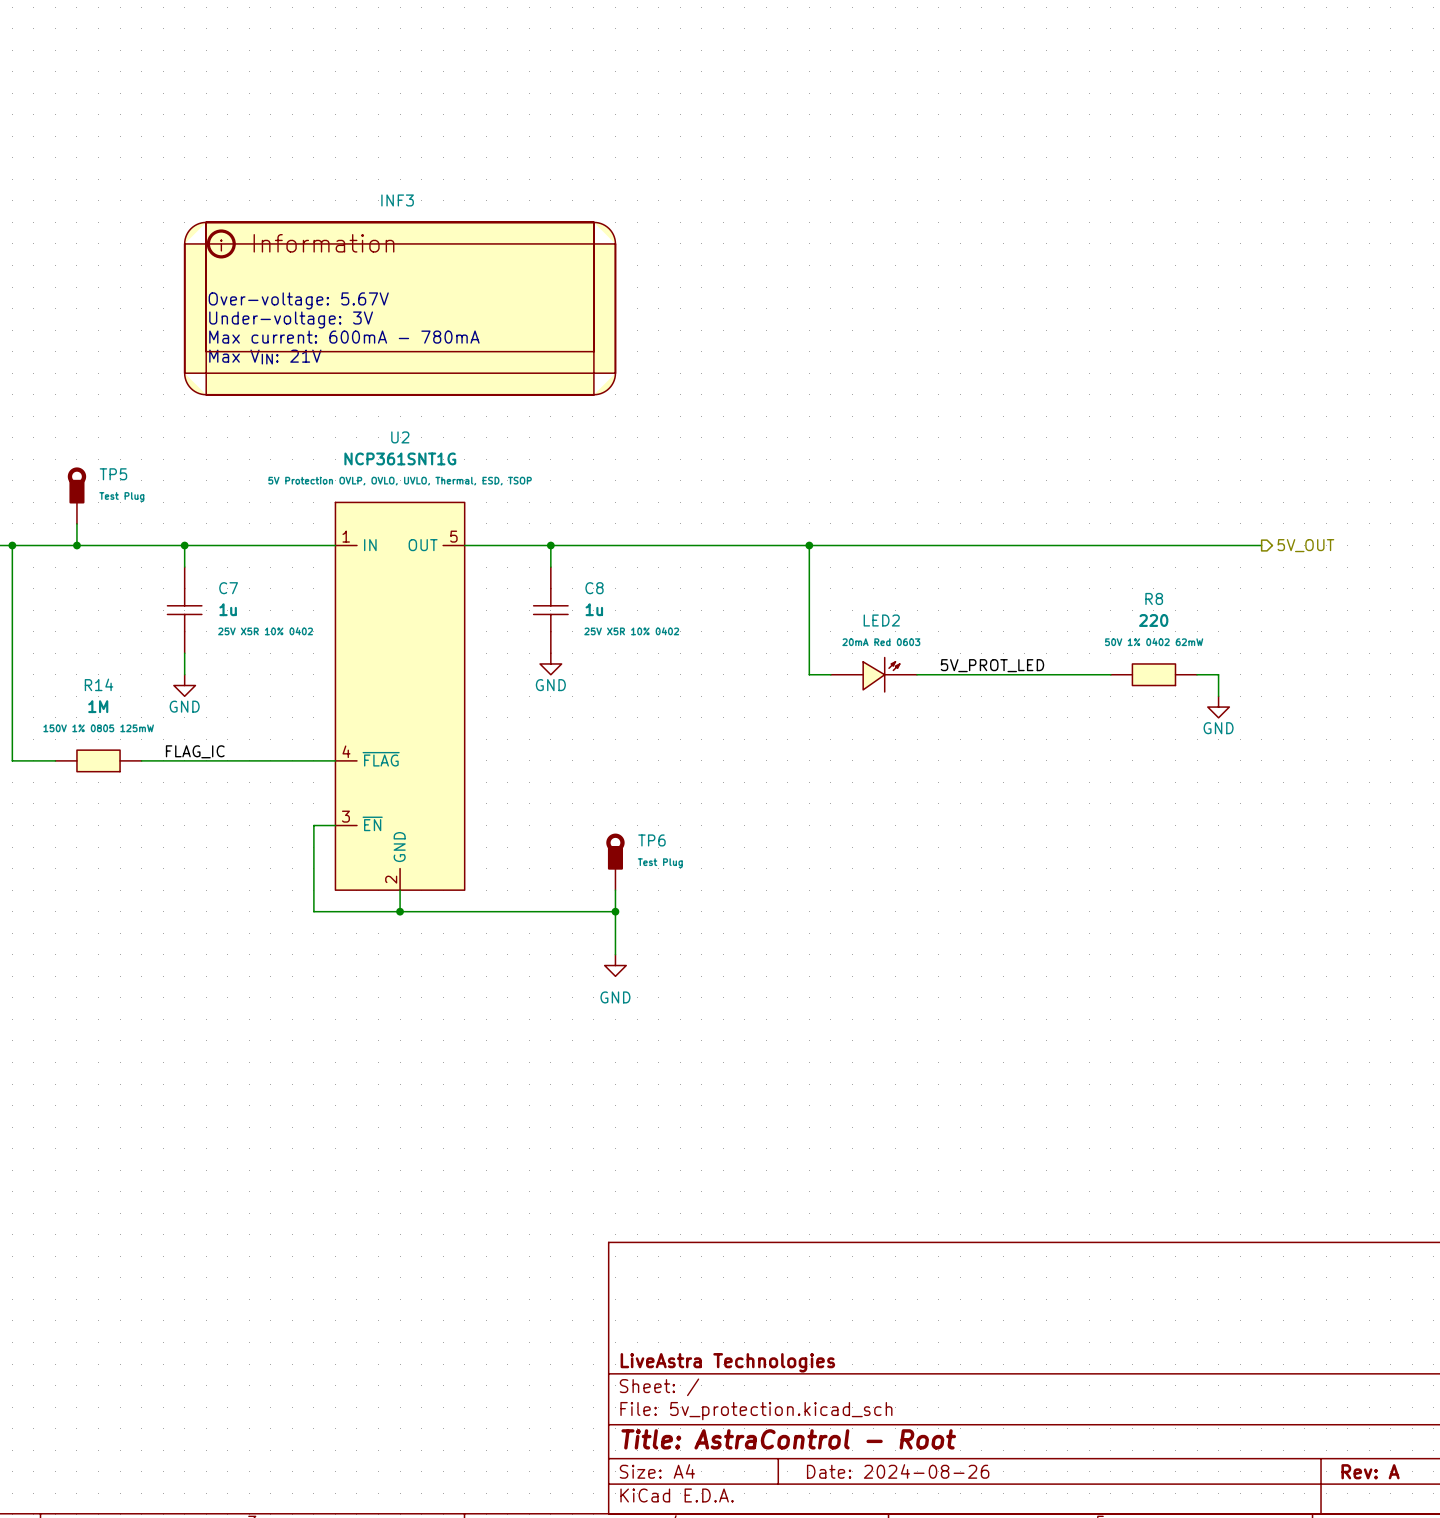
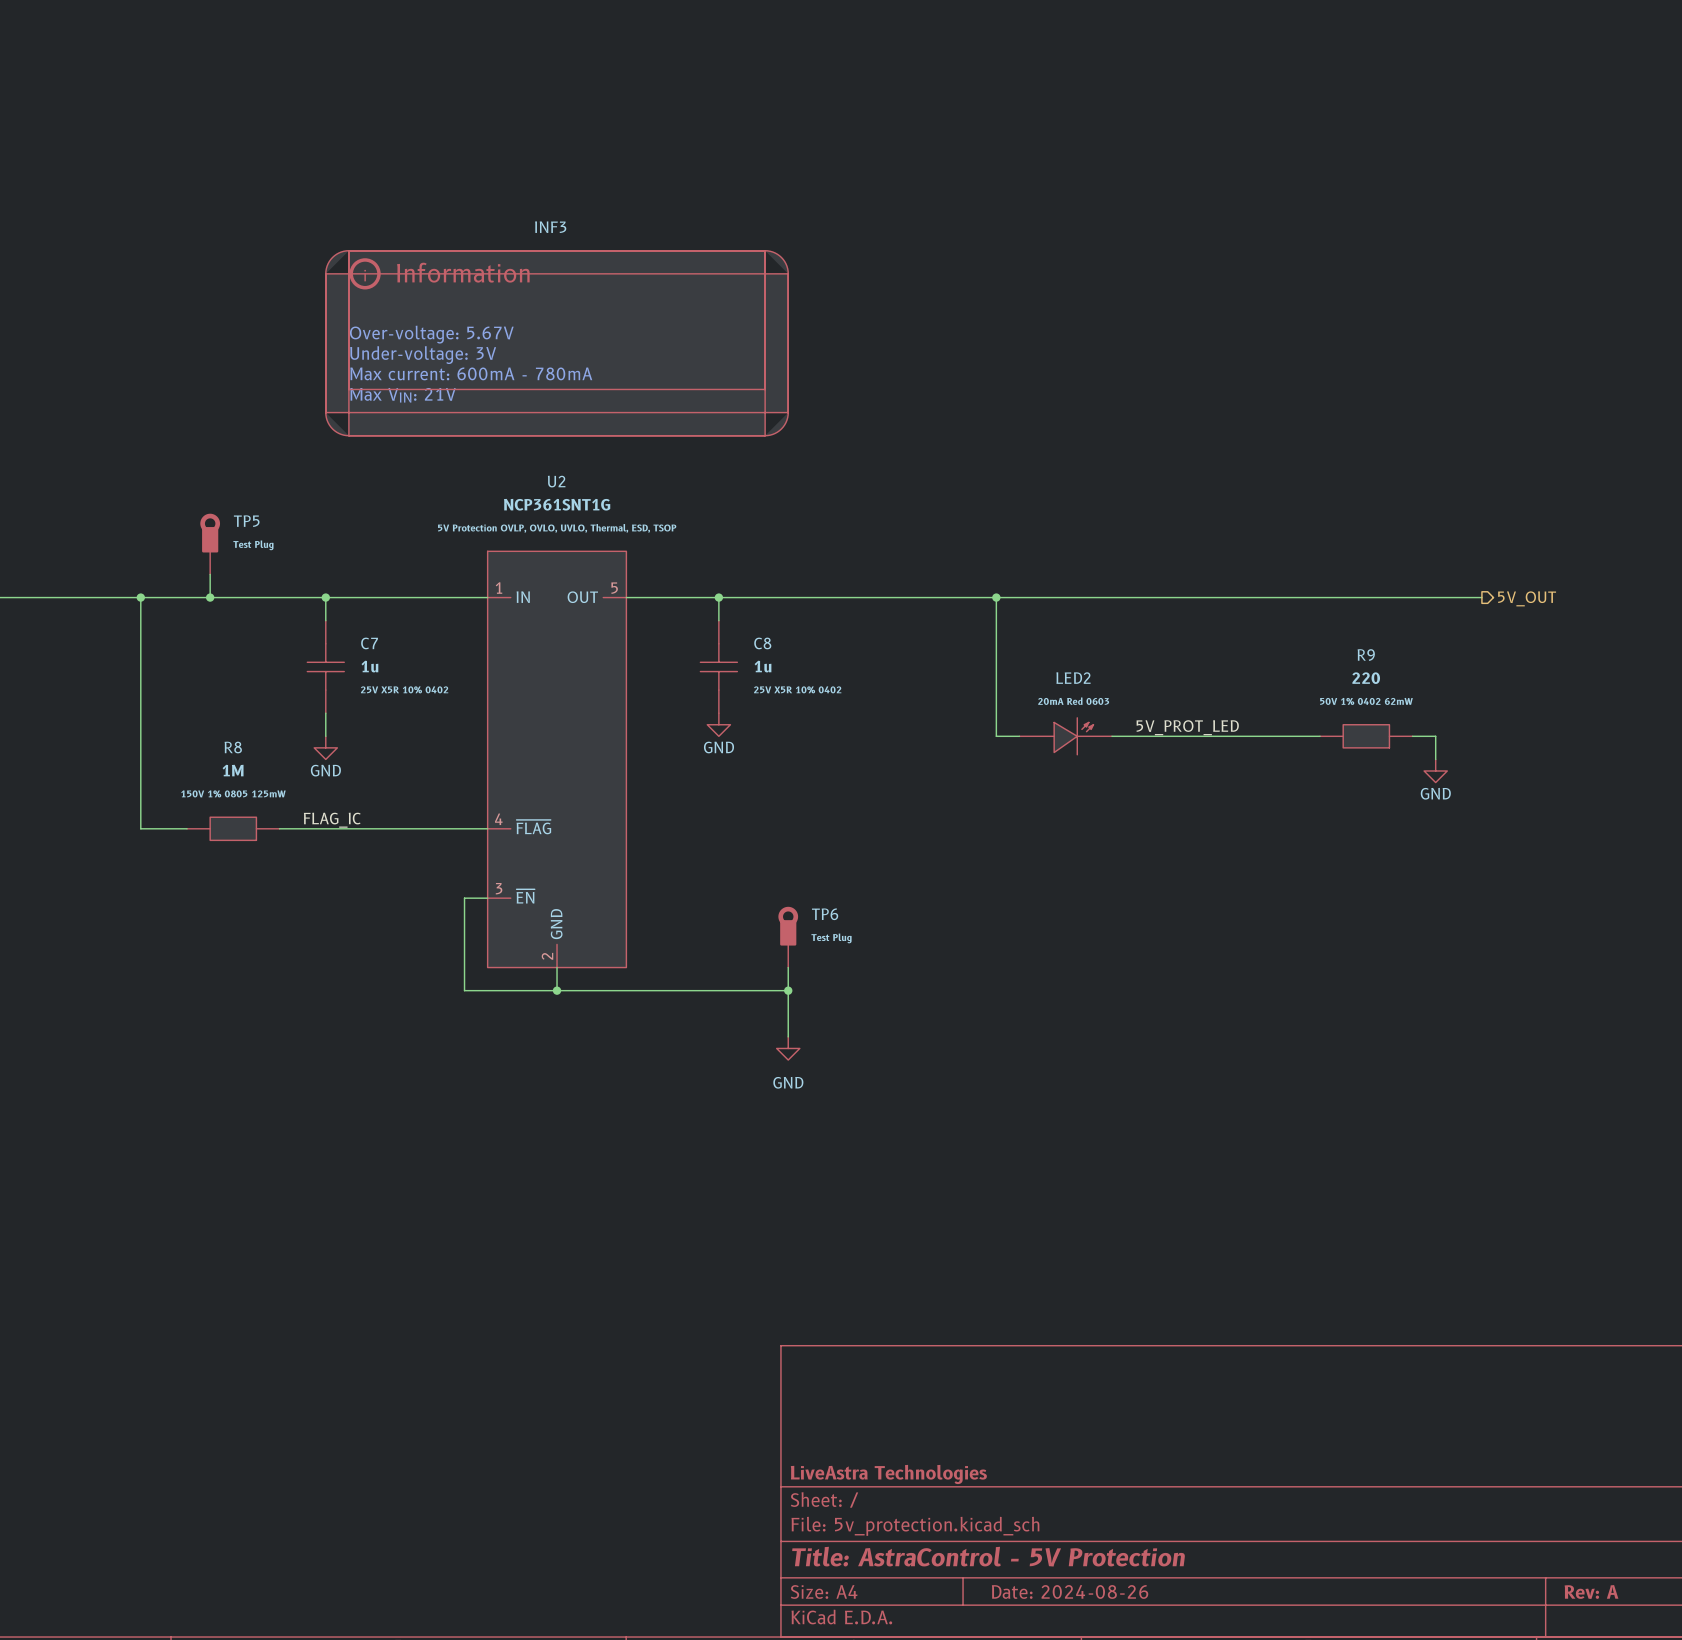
R8 name: R8 (1154, 598) -> R9 (1366, 655)
R14 name: R14 (99, 684) -> R8 (233, 747)
title block: Title: AstraControl - Root (788, 1439) -> Title: AstraControl - 5V Protection (988, 1556)

